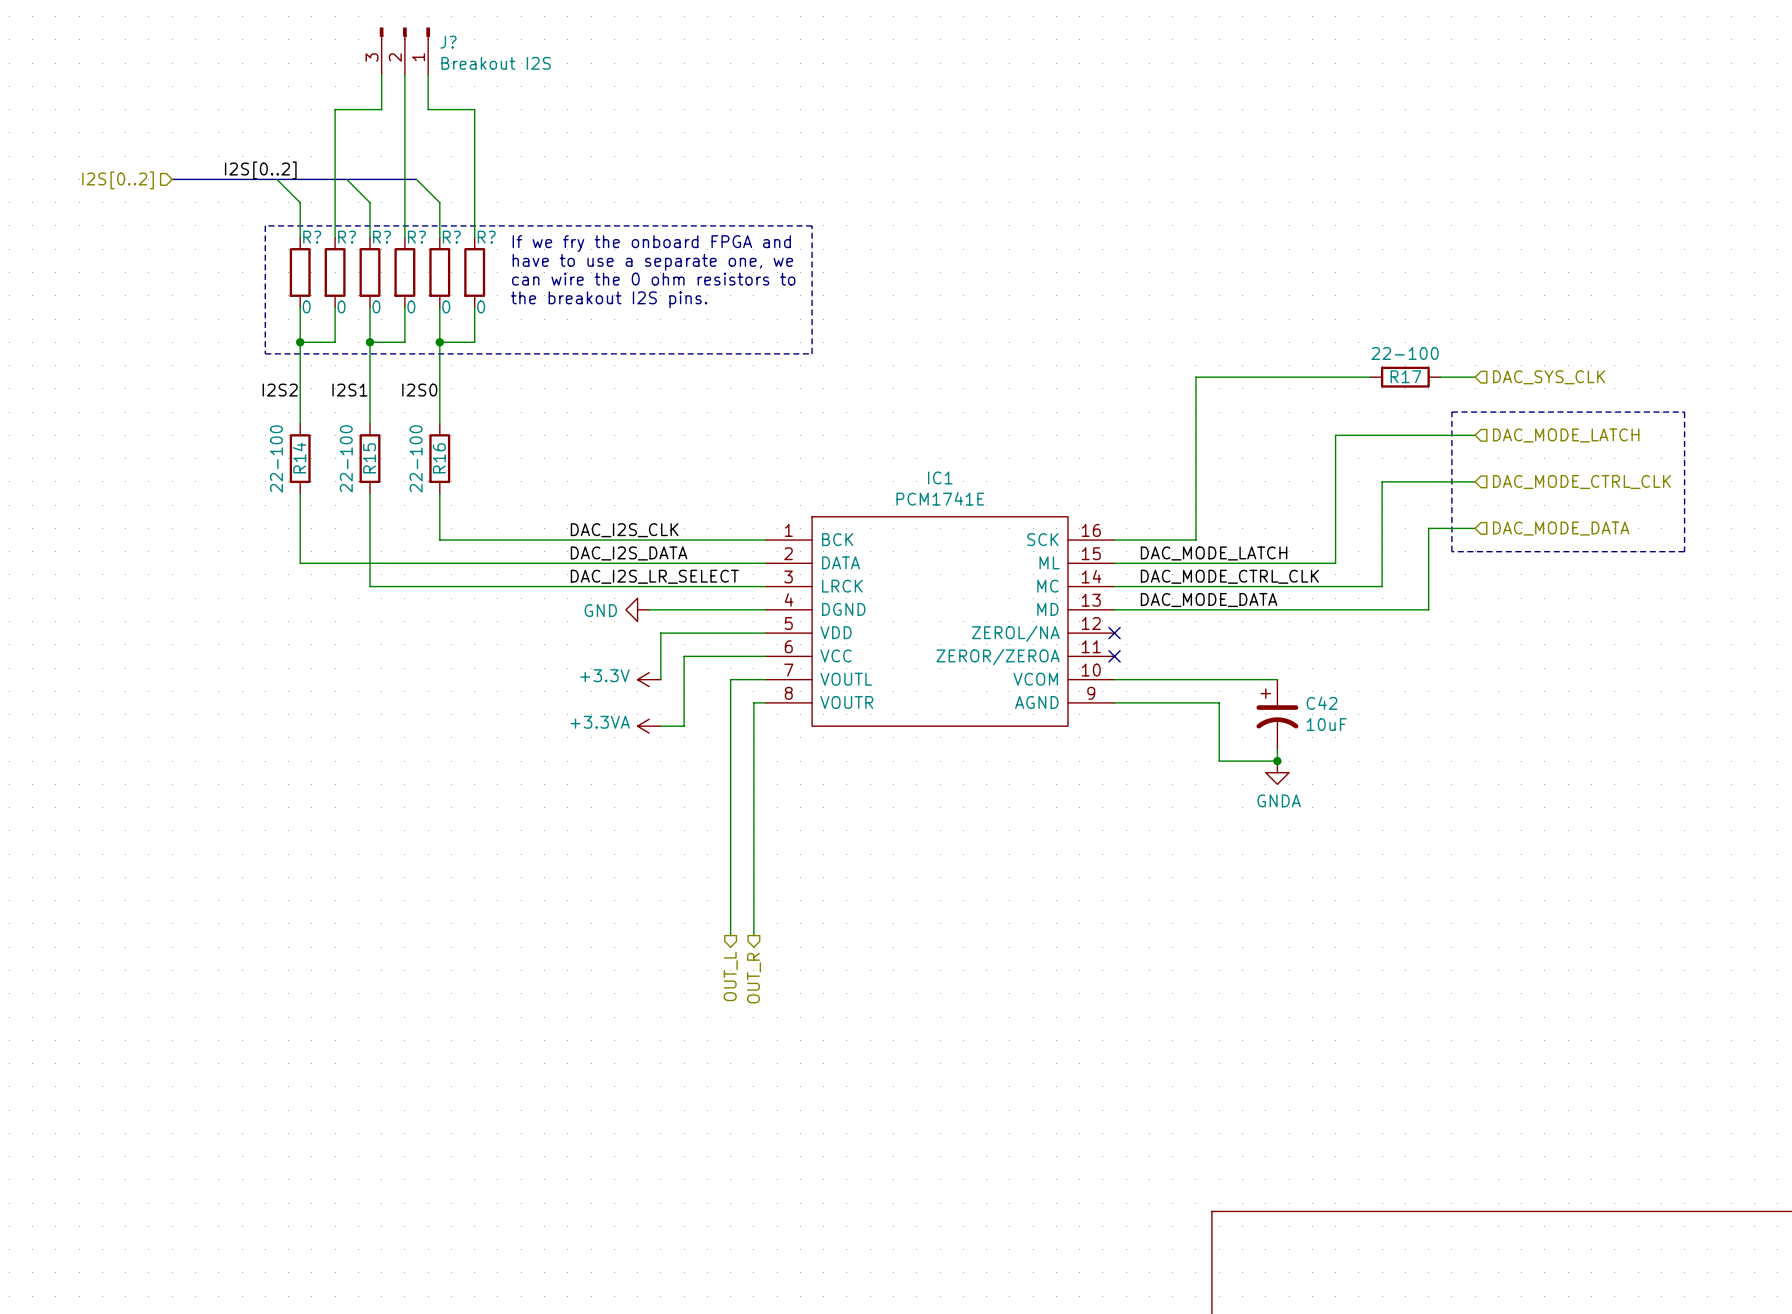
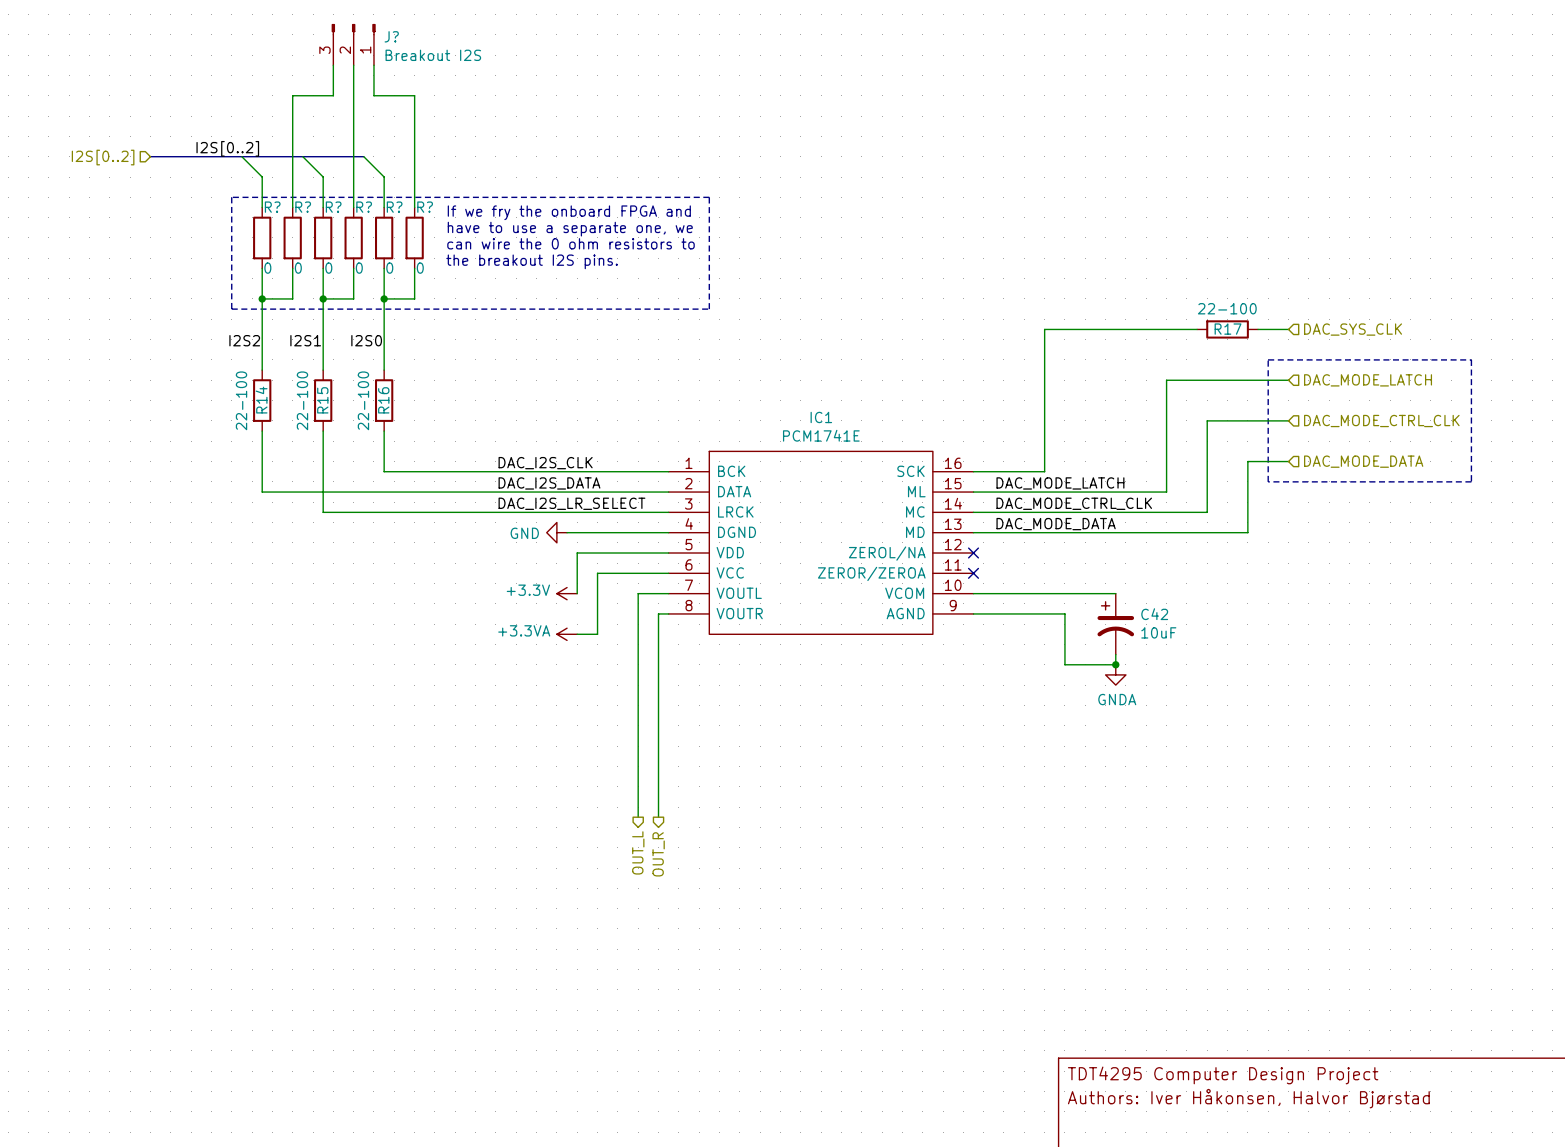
title block: none -> TDT4295 Computer Design Project (1223, 1075)
title block: none -> Authors: Iver Håkonsen, Halvor Bjørstad (1248, 1098)

